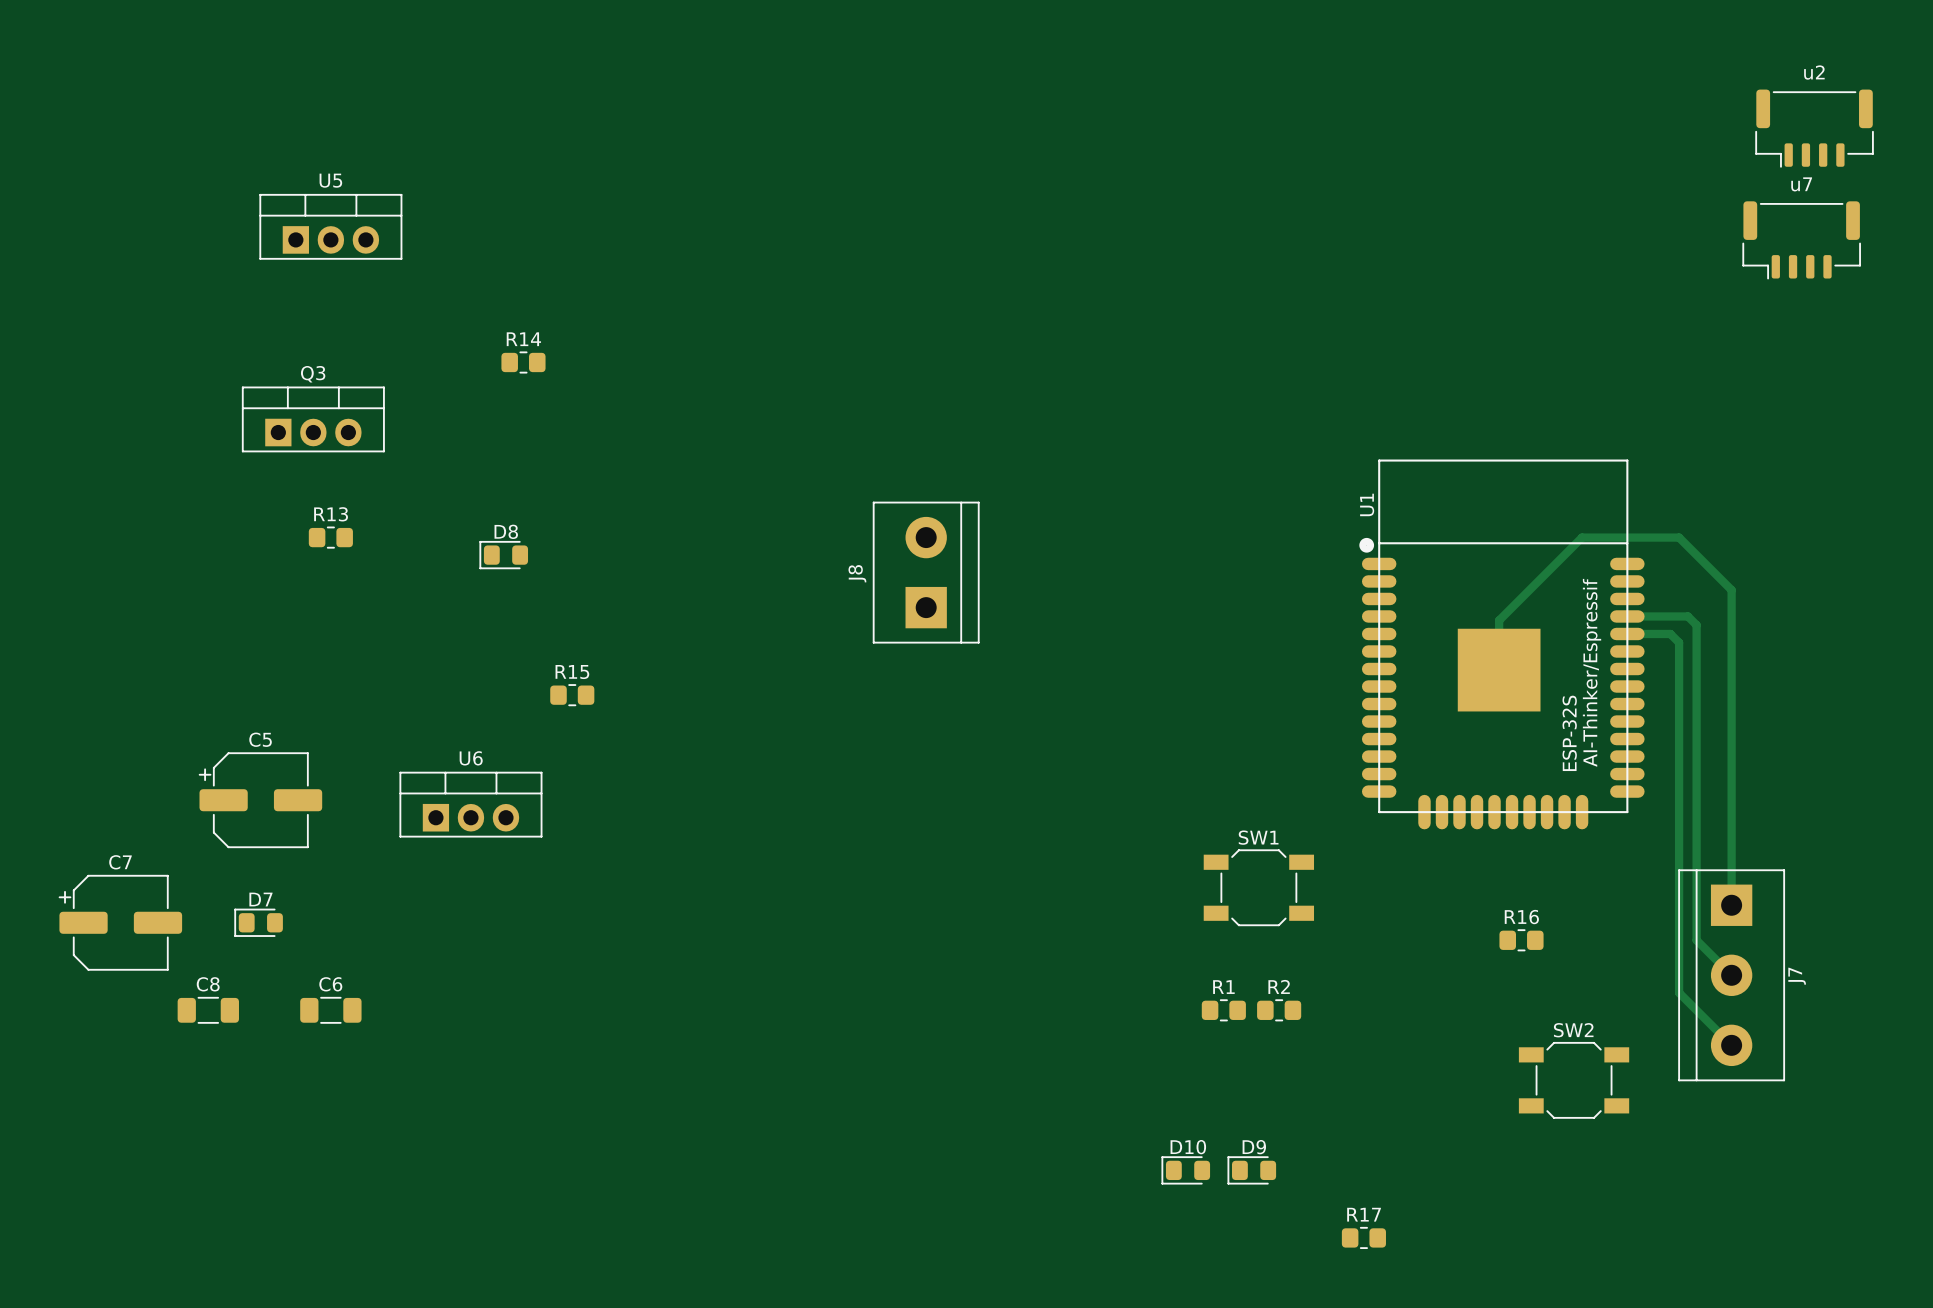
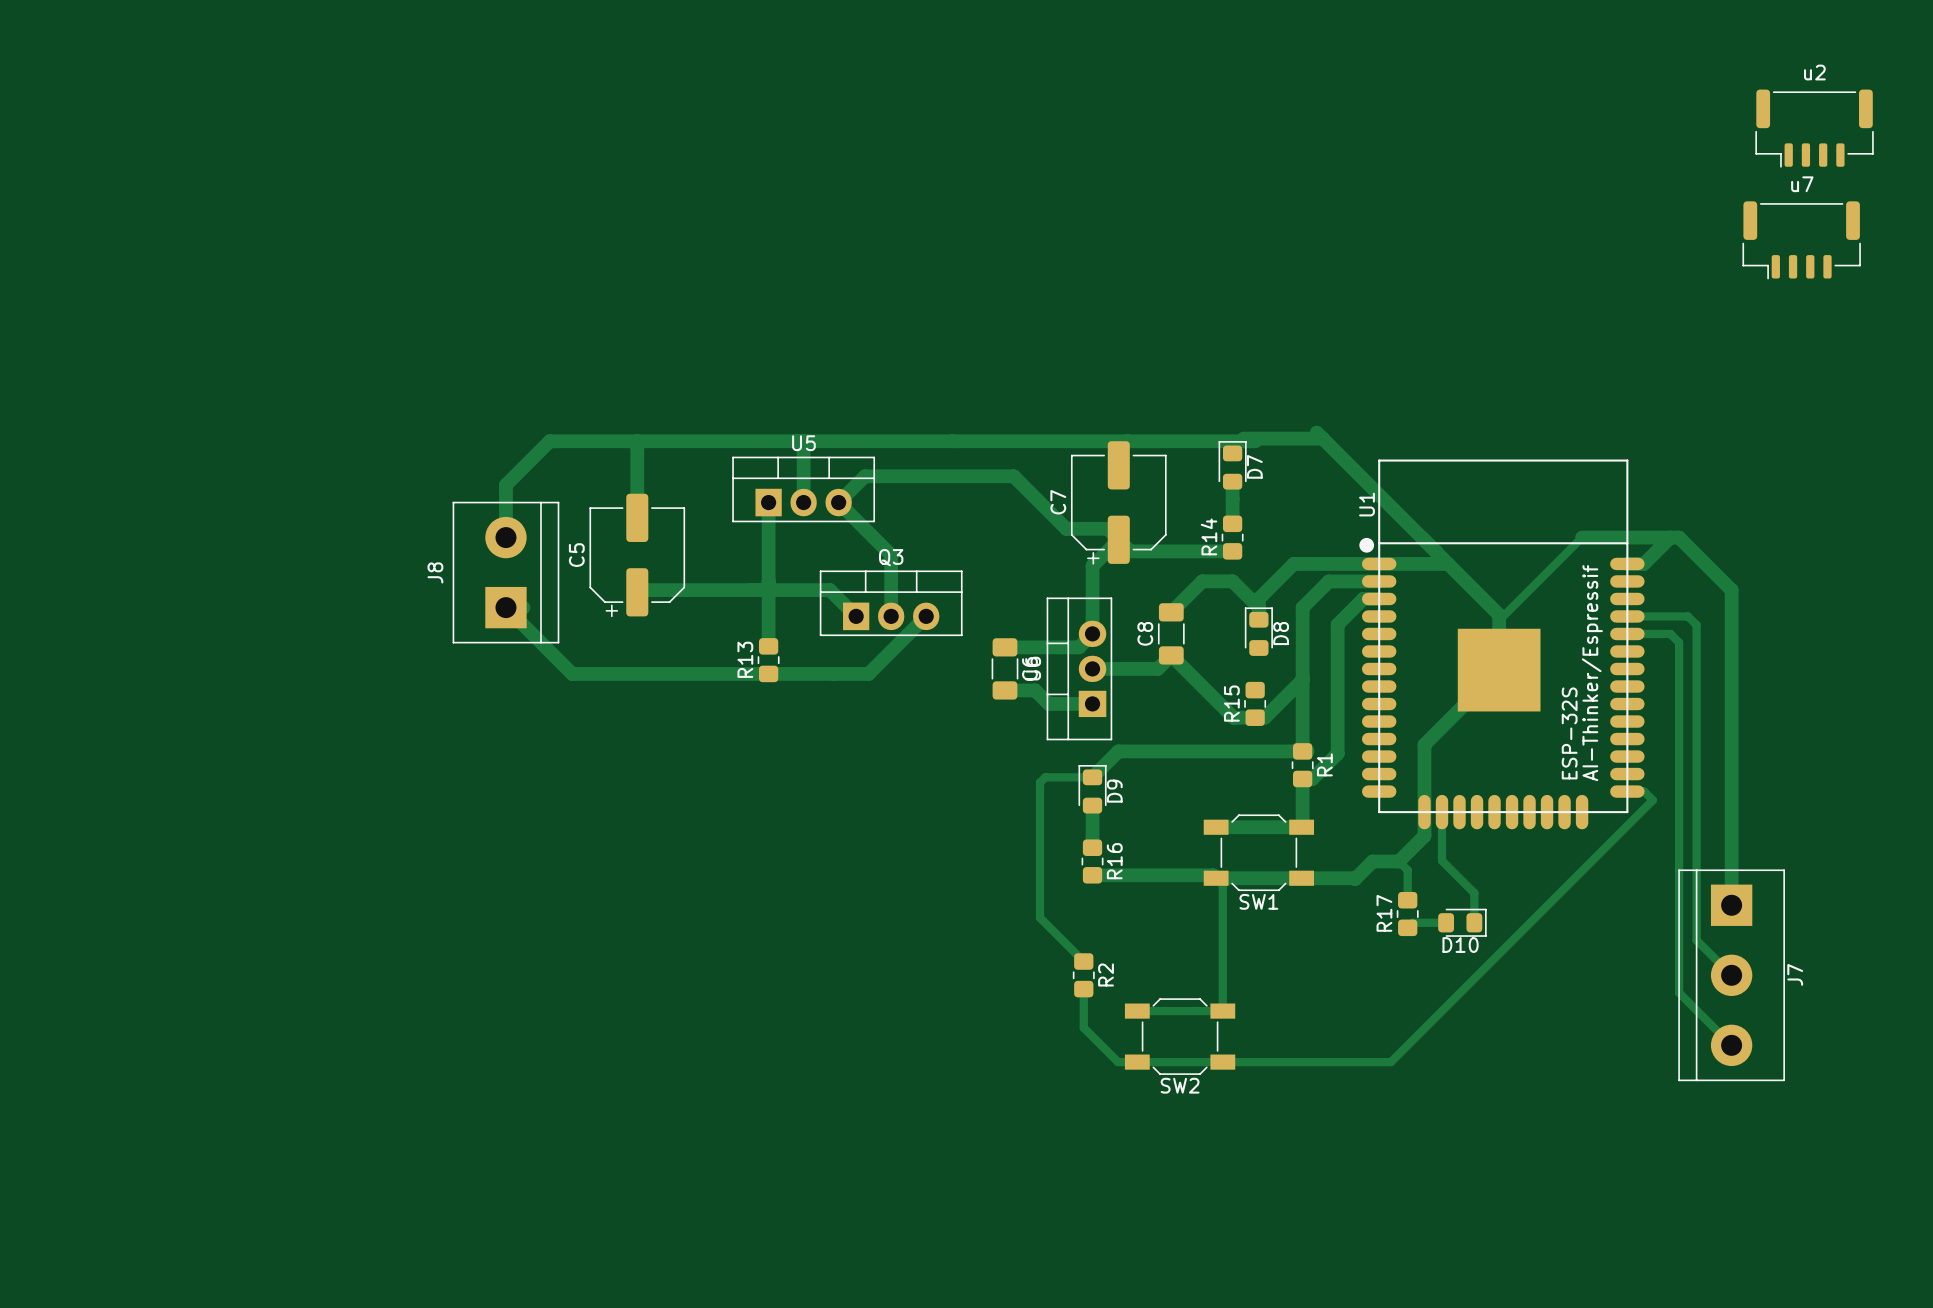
U5 position: (330, 226) -> (803, 489)
R14 name position: R14 (523, 339) -> R14 (1209, 536)
R14 rotation: 0° (523, 362) -> 90° clockwise (1232, 537)
R14 position: (523, 362) -> (1232, 537)
Q3 position: (313, 419) -> (891, 603)
track: none -> (1316, 432) (1499, 614) (1499, 670) (1424, 744) (1424, 835) (1398, 861)
track: none -> (1322, 438) (1244, 438) (1241, 441)
track: none -> (637, 441) (637, 517)
track: none -> (803, 441) (803, 502)
track: none -> (1255, 441) (549, 441) (505, 485) (505, 537)
track: none -> (1232, 481) (1232, 523)
track: none -> (768, 502) (768, 646)
R13 name position: R13 (331, 514) -> R13 (745, 659)
R13 rotation: 0° (330, 537) -> 90° clockwise (768, 660)
R13 position: (330, 537) -> (768, 660)
track width: thin (1582, 537) (1679, 537) (1731, 590) (1731, 905) -> thick (1582, 537) (1679, 537) (1731, 590) (1731, 905)
track: none -> (1670, 537) (1643, 563) (1627, 563)
track: none -> (1118, 539) (1092, 566) (1092, 633) (1079, 647) (1004, 647)
track: none -> (1232, 551) (1130, 551) (1107, 528) (1066, 528) (1013, 476) (864, 476) (838, 502) (891, 555) (891, 616)
D8 rotation: 0° (503, 555) -> 90° clockwise (1258, 631)
D8 position: (503, 555) -> (1258, 631)
track: none -> (1448, 563) (1293, 563) (1258, 598) (1258, 619)
J8 position: (926, 572) -> (505, 572)
track: none -> (1353, 581) (1379, 581) (1328, 581) (1302, 607) (1302, 751)
track: none -> (637, 592) (639, 590) (829, 590) (856, 616)
track: none -> (1379, 598) (1363, 598) (1337, 624) (1337, 753) (1312, 778) (1302, 778) (1302, 826) (1216, 827)
track: none -> (523, 607) (505, 607) (572, 673) (868, 673) (926, 616)
track: none -> (1258, 607) (1232, 581) (1202, 581) (1171, 612)
track: none -> (1092, 668) (1157, 668) (1171, 655) (1233, 717) (1264, 717) (1302, 679)
R15 name position: R15 (572, 672) -> R15 (1231, 703)
track: none -> (1004, 690) (1035, 690) (1048, 703) (1092, 703)
R15 rotation: 0° (572, 695) -> 90° clockwise (1255, 703)
R15 position: (572, 695) -> (1255, 703)
C5 name position: C5 (260, 739) -> C5 (576, 555)
track: none -> (1307, 751) (1118, 751) (1092, 777) (1045, 777) (1040, 782) (1040, 917) (1083, 961)
C5 footprint: [198, 752, 323, 849] -> [589, 493, 686, 618]
track: none -> (1627, 791) (1644, 791) (1652, 800) (1390, 1062) (1118, 1062) (1083, 1027) (1083, 989)
U6 rotation: 0° (470, 804) -> 90° counterclockwise (1079, 668)
U6 position: (470, 804) -> (1079, 668)
track: none -> (1092, 805) (1092, 847)
track: none -> (1441, 812) (1441, 860) (1474, 893) (1474, 922)
SW1 name position: SW1 (1258, 837) -> SW1 (1258, 901)
track: none -> (1398, 861) (1372, 861) (1355, 879) (1216, 878)
track: none -> (1398, 861) (1407, 870) (1407, 900)
C7 name position: C7 (120, 862) -> C7 (1058, 502)
C7 footprint: [58, 874, 183, 971] -> [1070, 441, 1167, 565]
track: none -> (1092, 875) (1213, 875) (1216, 878)
track: none -> (1216, 878) (1222, 884) (1222, 1011) (1137, 1011)
SW1 position: (1258, 887) -> (1258, 852)
D7 rotation: 0° (258, 922) -> 90° clockwise (1232, 465)
D7 position: (258, 922) -> (1232, 465)
track: none -> (1446, 922) (1412, 922) (1407, 927)
R16 rotation: 0° (1521, 940) -> 90° clockwise (1092, 861)
R16 position: (1521, 940) -> (1092, 861)
C8 name position: C8 (208, 984) -> C8 (1145, 633)
C8 rotation: 0° (208, 1010) -> 90° clockwise (1171, 633)
C8 position: (208, 1010) -> (1171, 633)
C6 rotation: 0° (330, 1010) -> 90° clockwise (1004, 668)
C6 position: (330, 1010) -> (1004, 668)
R1 rotation: 0° (1223, 1010) -> 90° clockwise (1302, 765)
R1 position: (1223, 1010) -> (1302, 765)
R2 rotation: 0° (1279, 1010) -> 90° clockwise (1083, 975)
R2 position: (1279, 1010) -> (1083, 975)
SW2 name position: SW2 (1573, 1030) -> SW2 (1180, 1085)
SW2 position: (1574, 1080) -> (1180, 1036)
D10 rotation: 0° (1185, 1170) -> 180° (1462, 922)
D10 position: (1185, 1170) -> (1462, 922)
D9 rotation: 0° (1251, 1170) -> 90° clockwise (1092, 789)
D9 position: (1251, 1170) -> (1092, 789)
R17 name position: R17 (1364, 1214) -> R17 (1384, 913)
R17 rotation: 0° (1363, 1237) -> 90° clockwise (1407, 914)
R17 position: (1363, 1237) -> (1407, 914)

